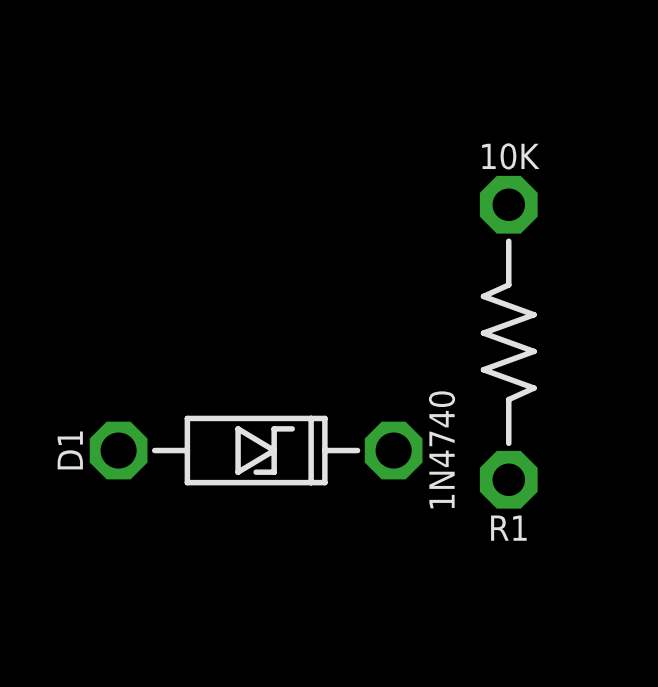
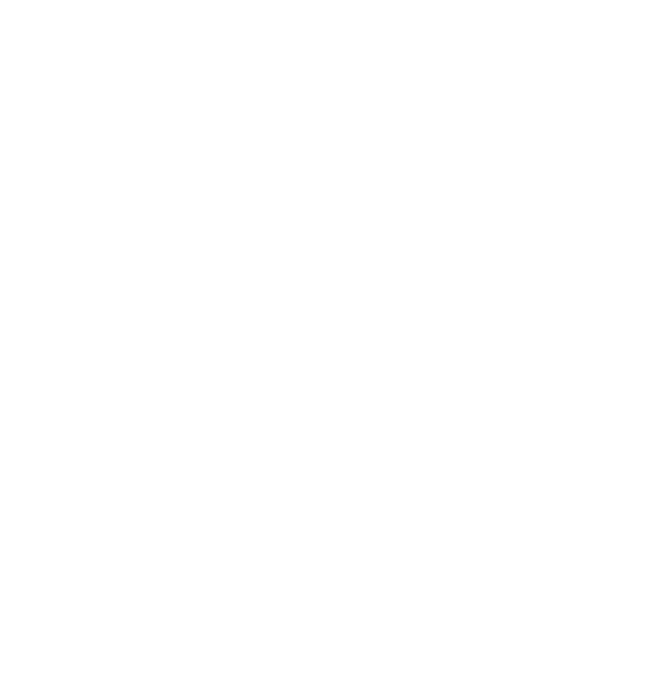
R1: 10K (508, 342) -> none
D1: 1N4740 (256, 450) -> none

